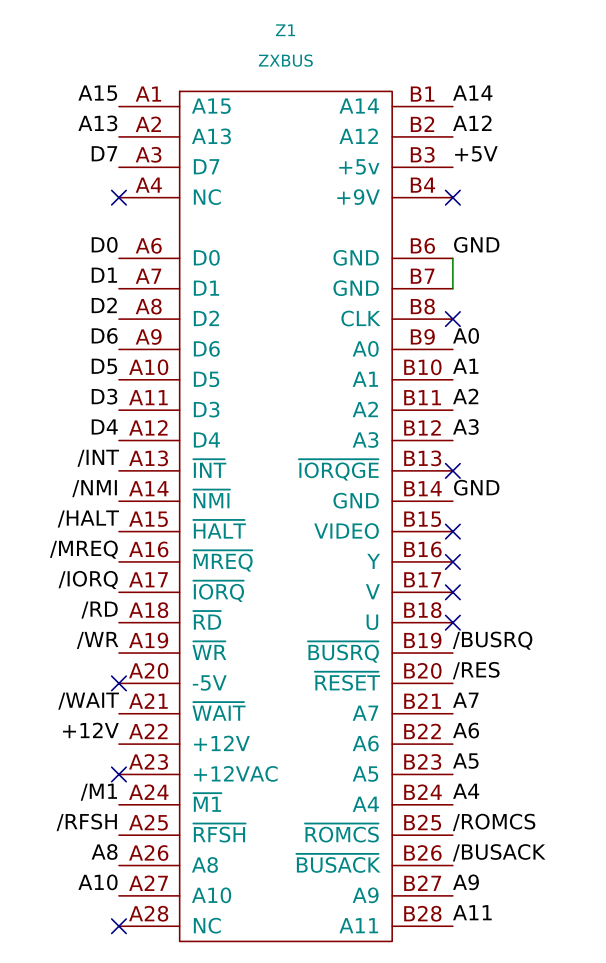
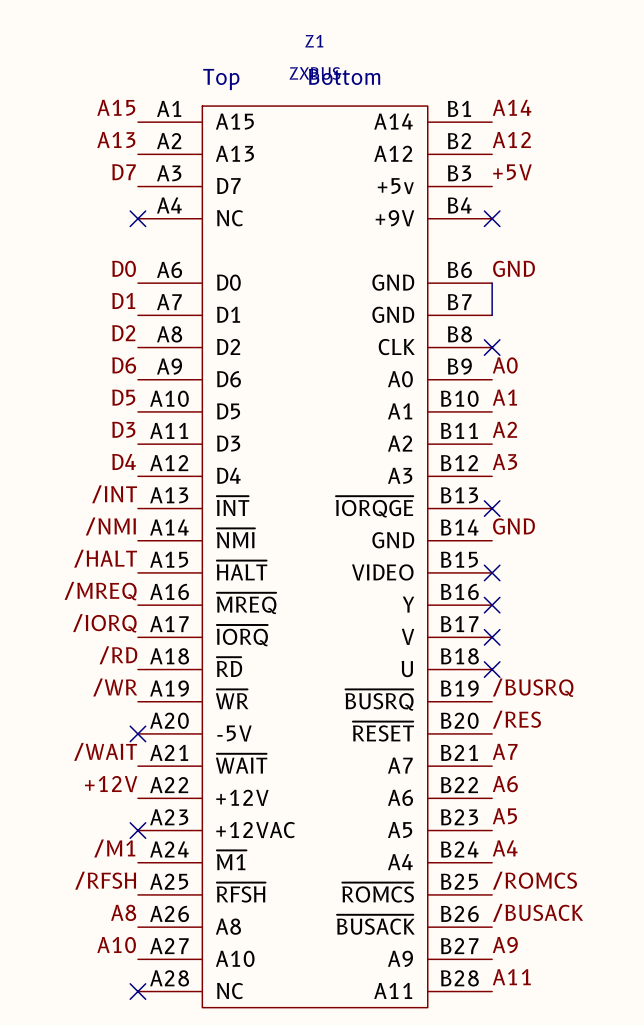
text: none -> Top Bottom (291, 79)

